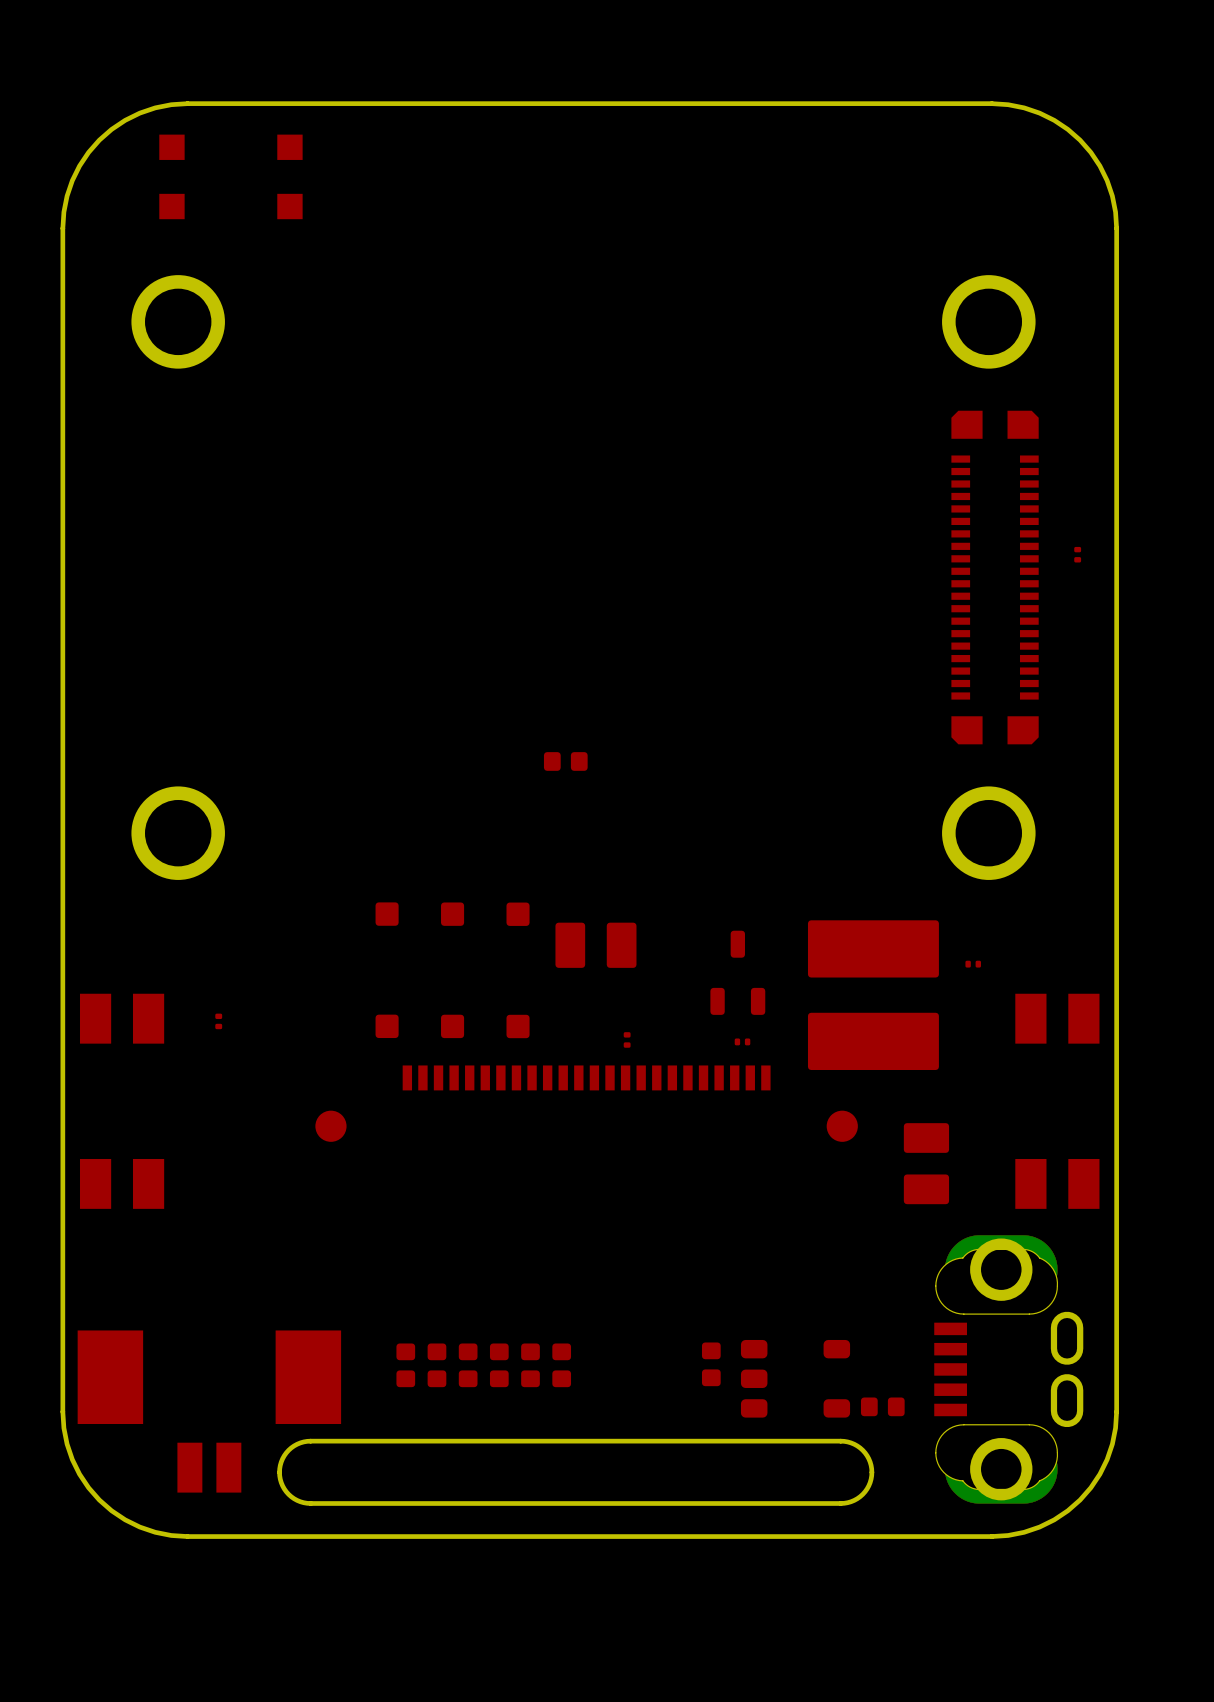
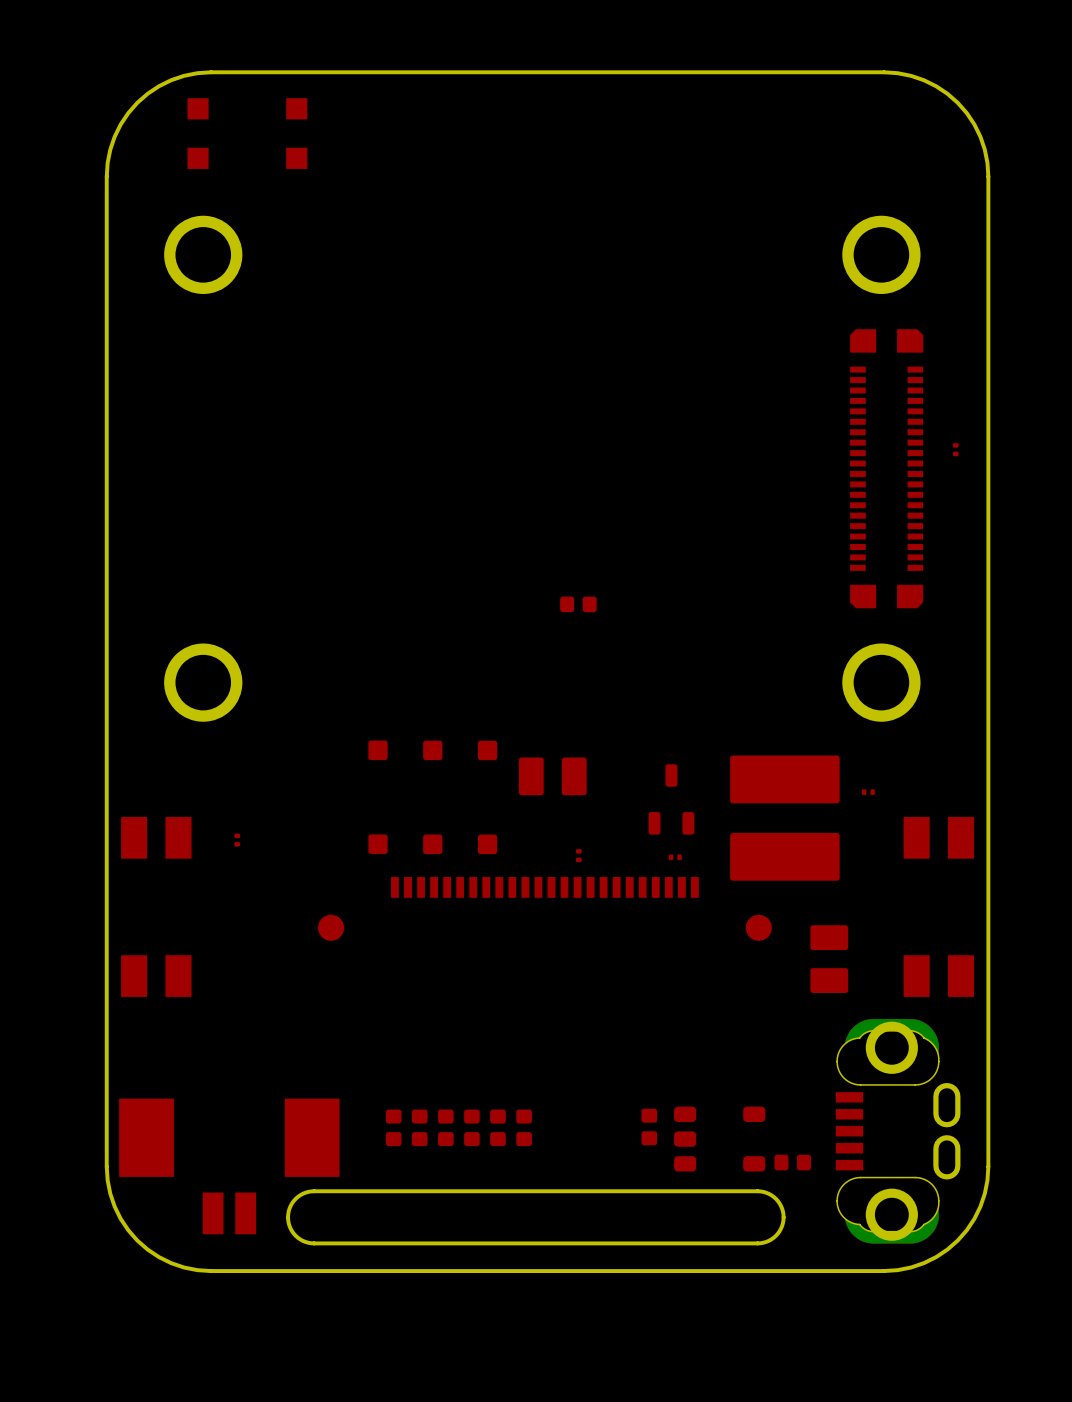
part position: (565, 761) -> (578, 604)

